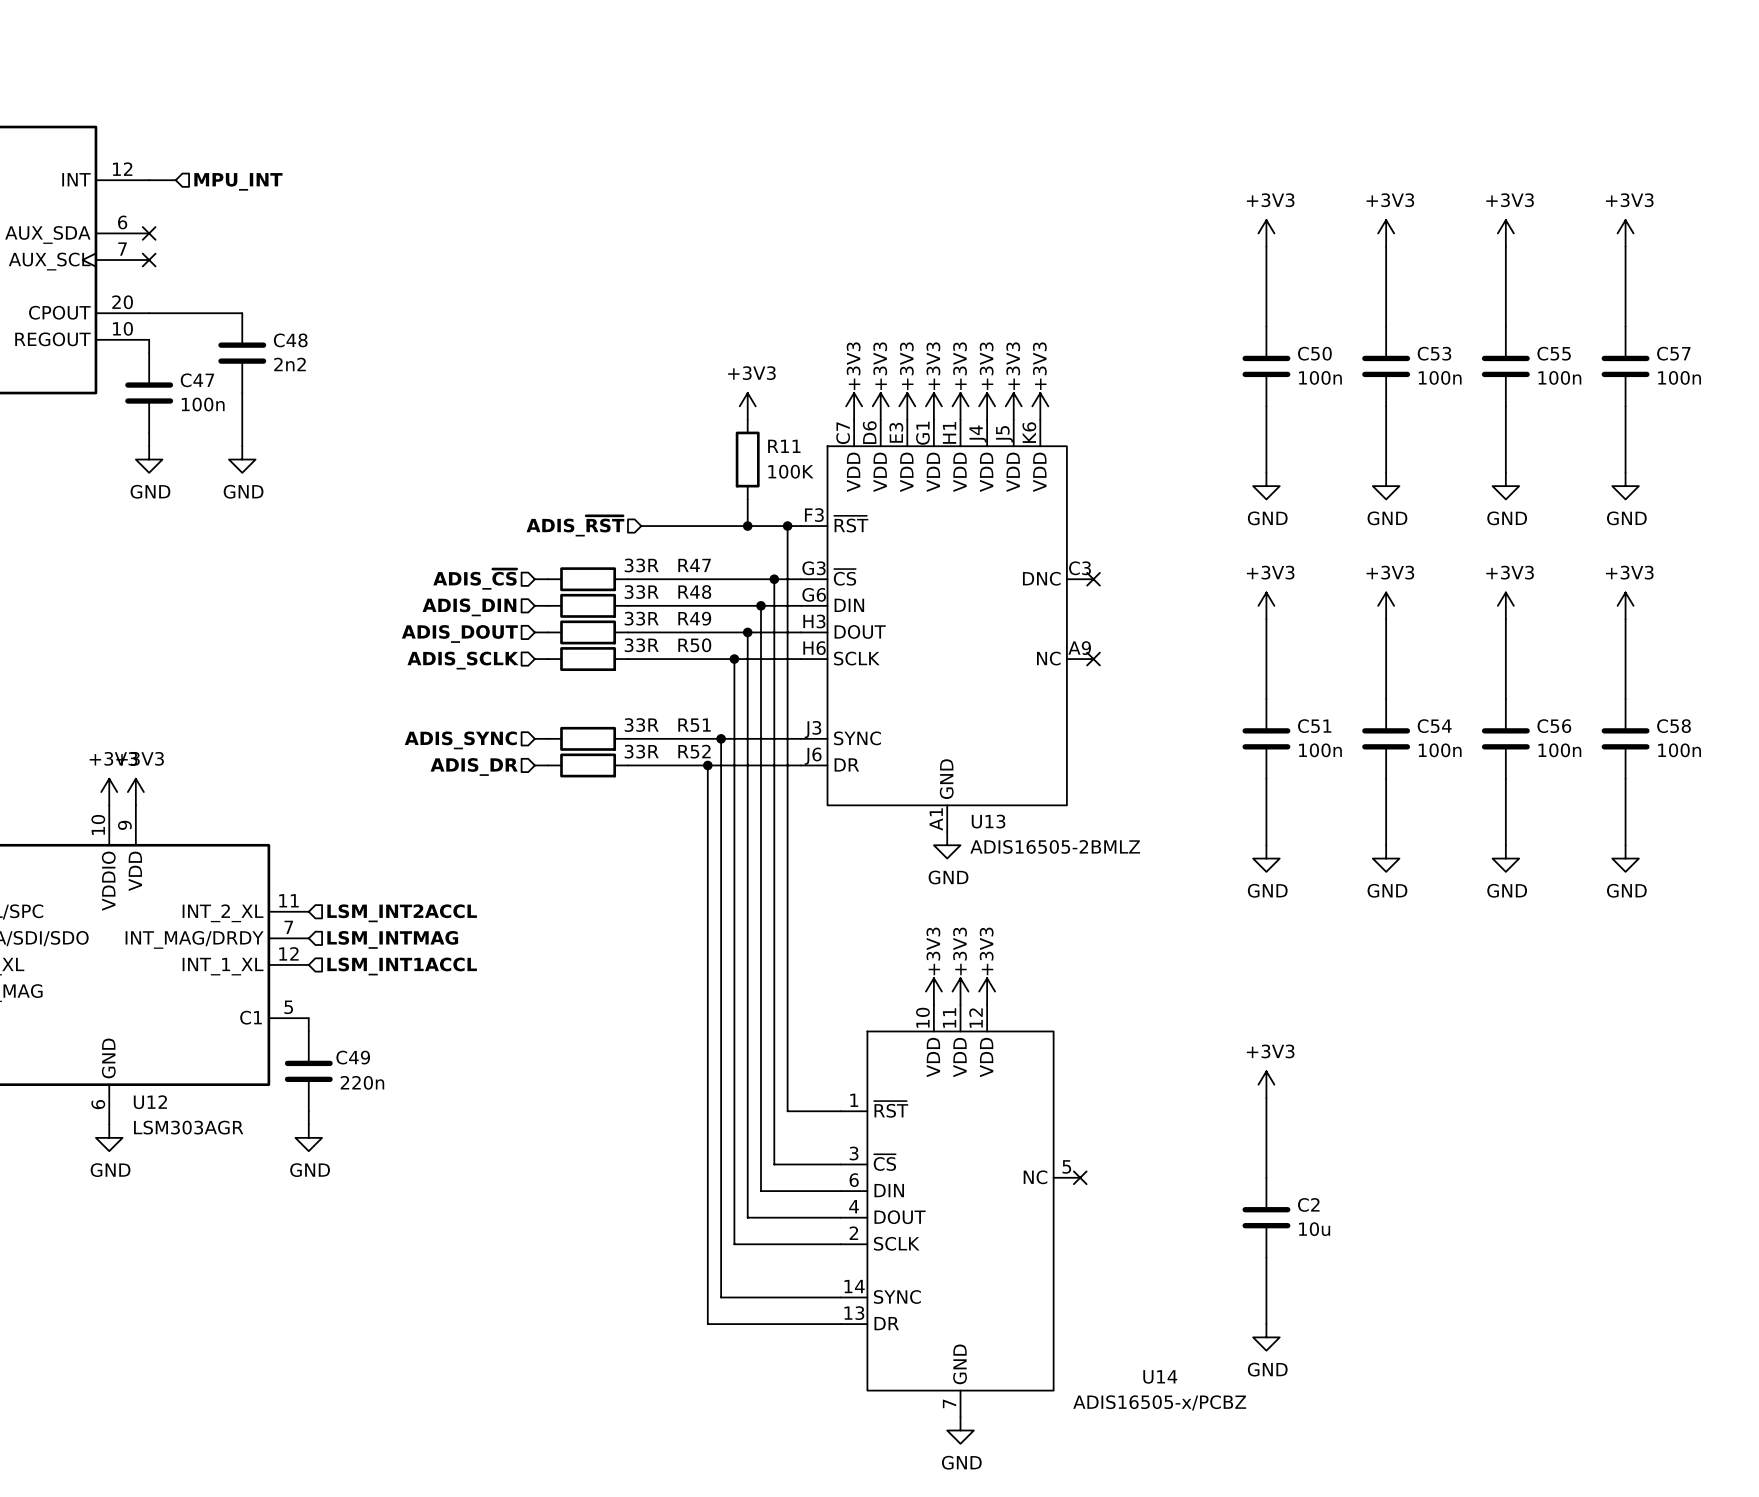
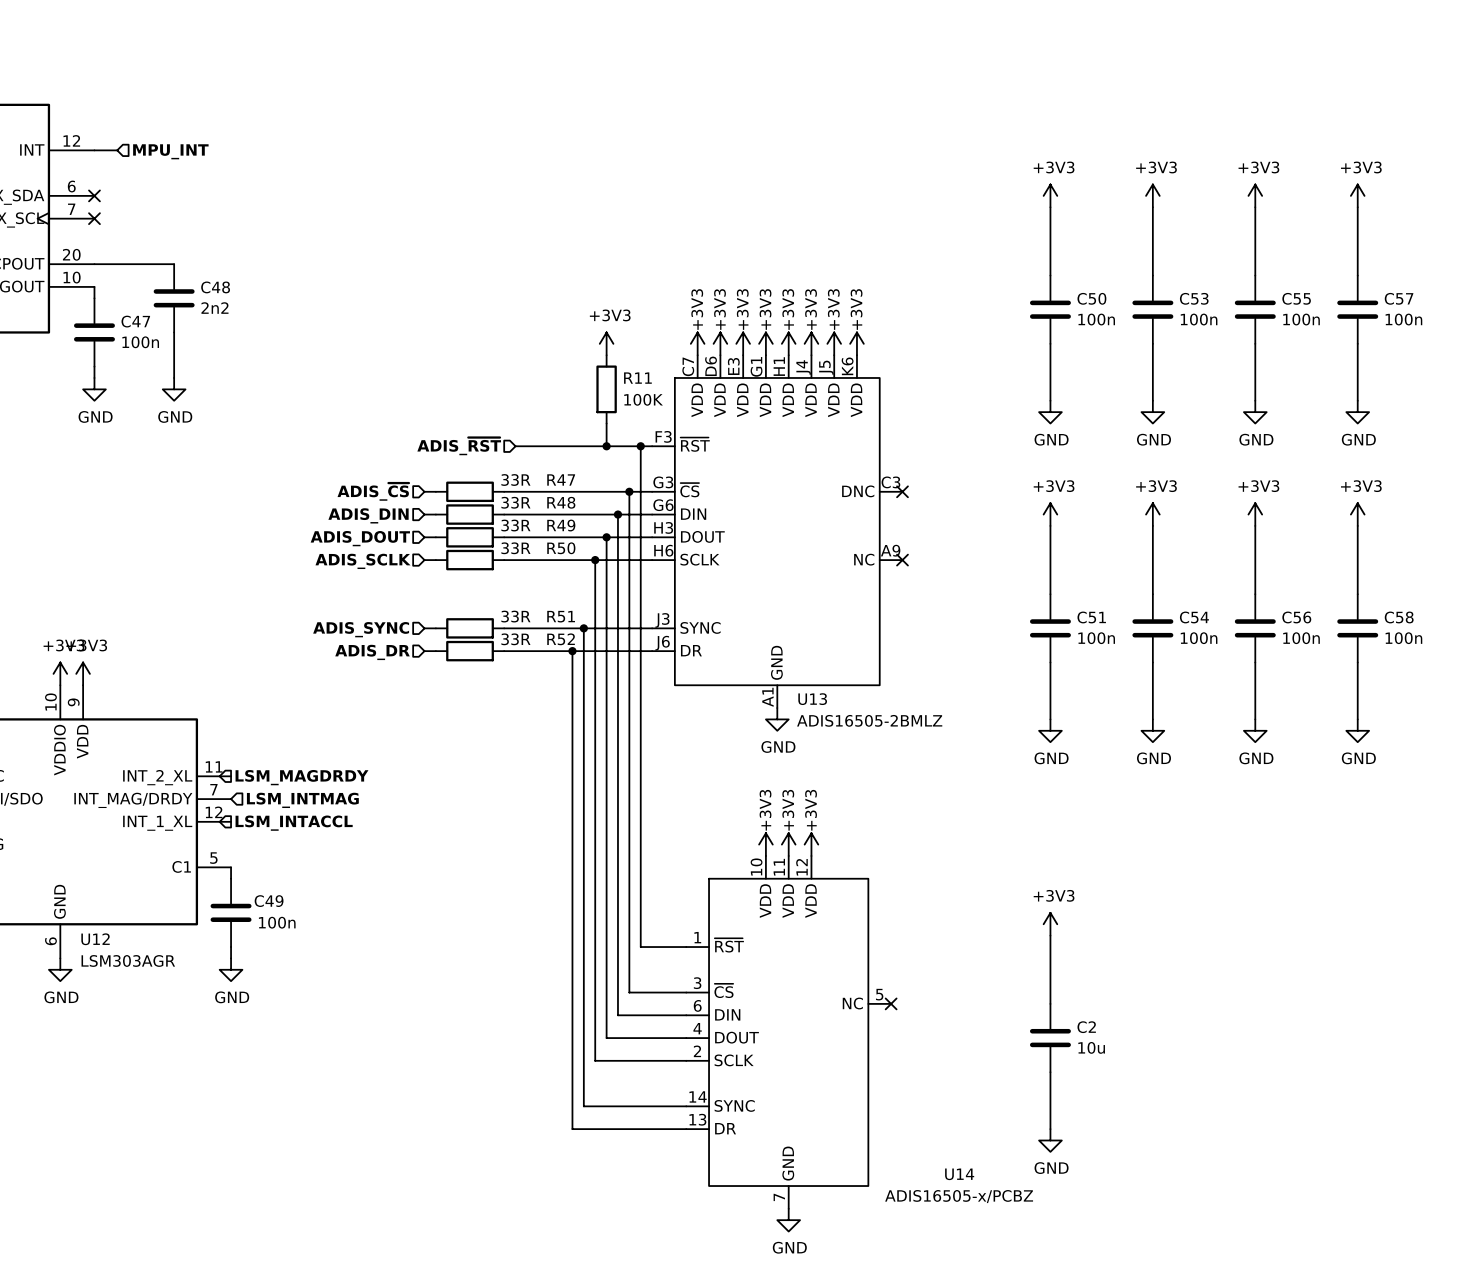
hierarchical label: none -> LSM_MAGDRDY (302, 777)
hierarchical label: LSM_INT2ACCL (402, 913) -> none
hierarchical label: LSM_INT1ACCL (402, 966) -> LSM_INTACCL (294, 823)
C49 value: 220n (362, 1082) -> 100n (277, 922)

